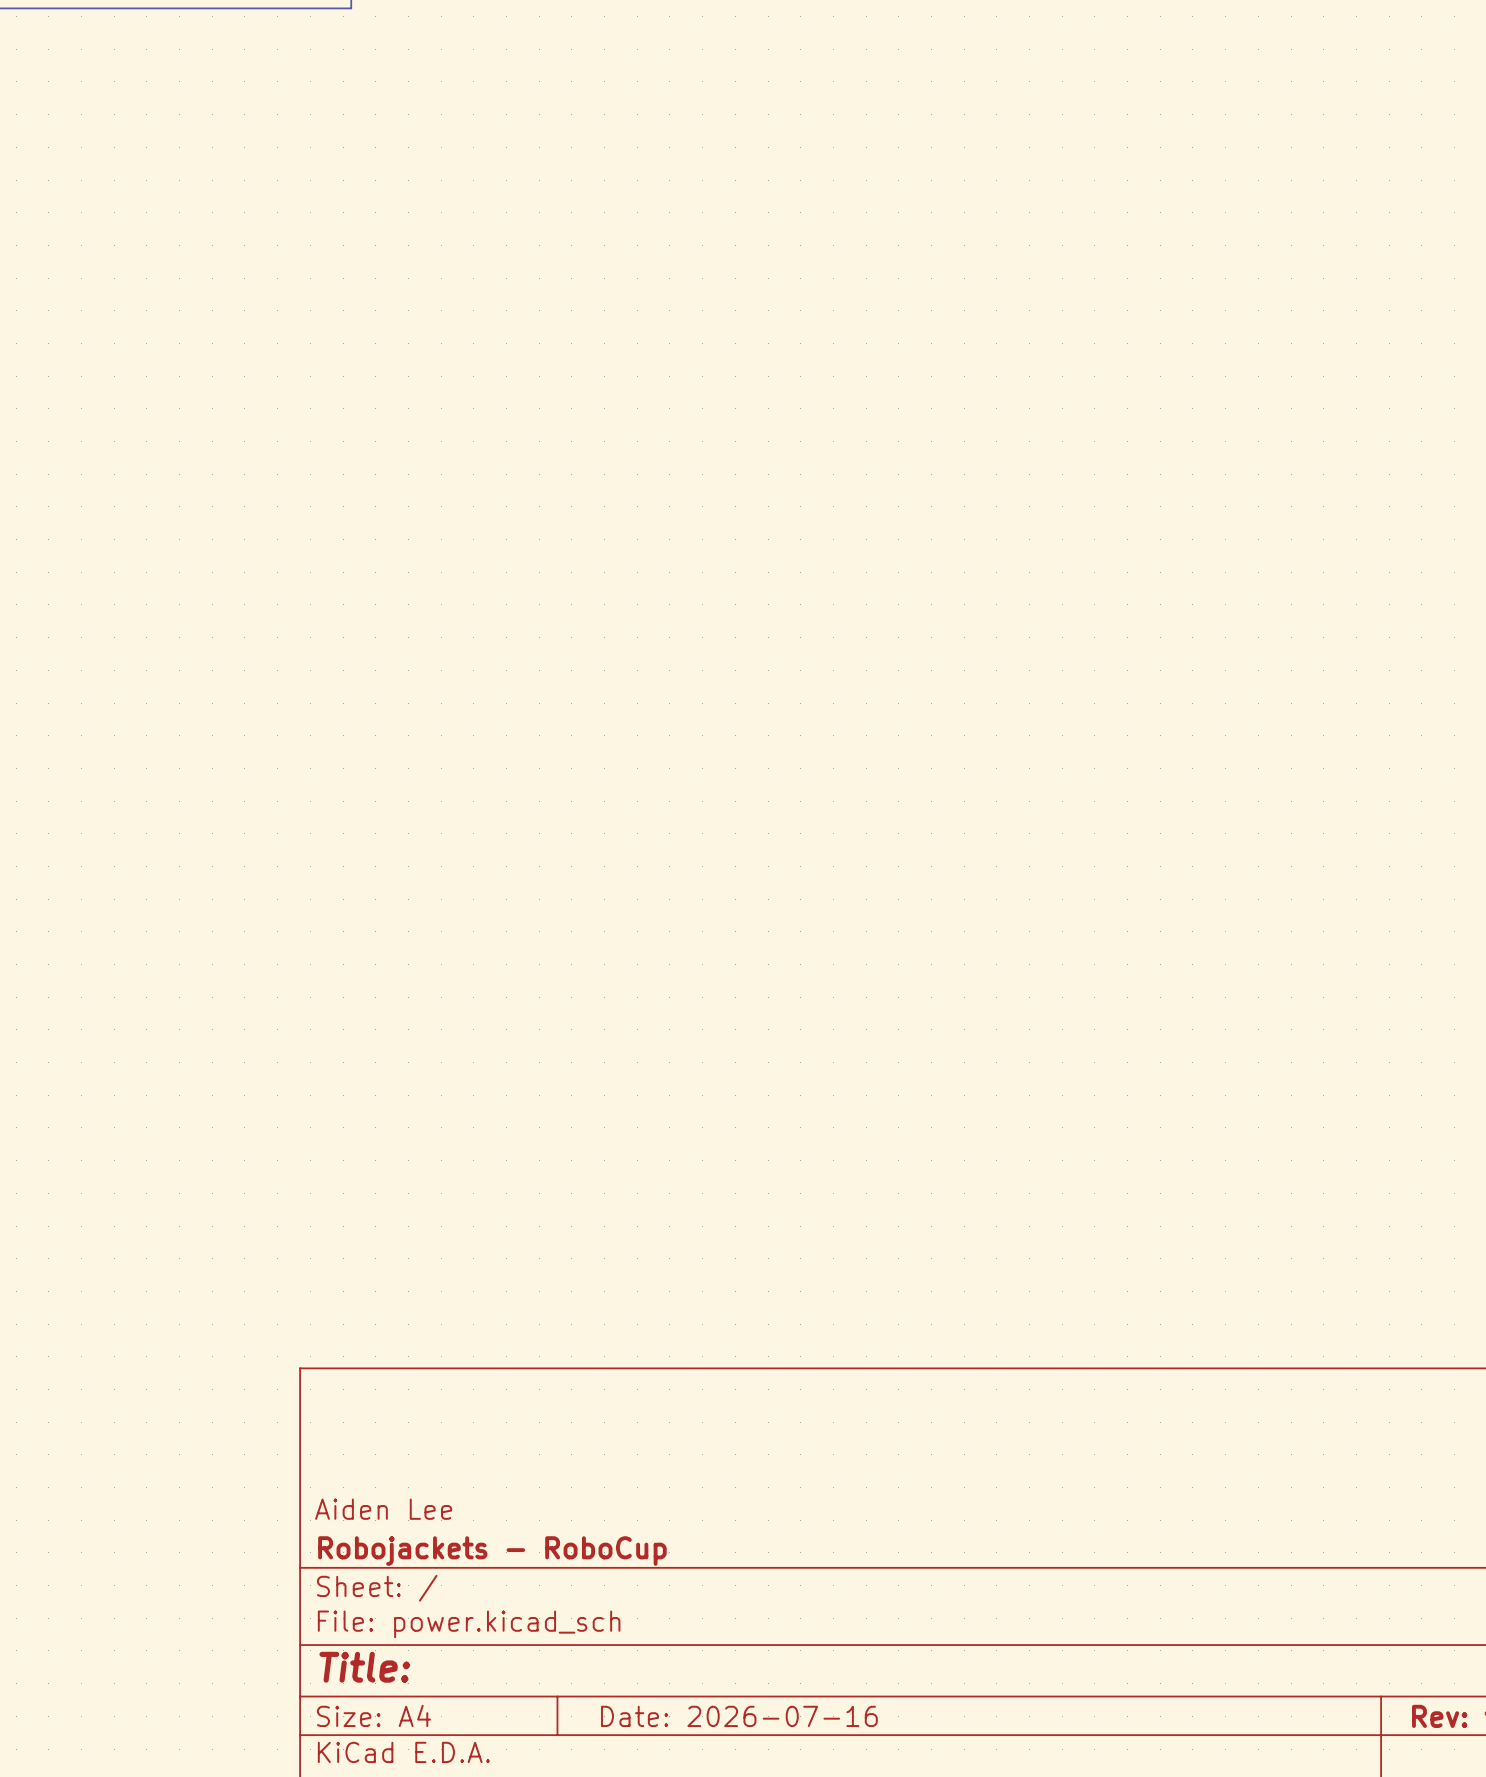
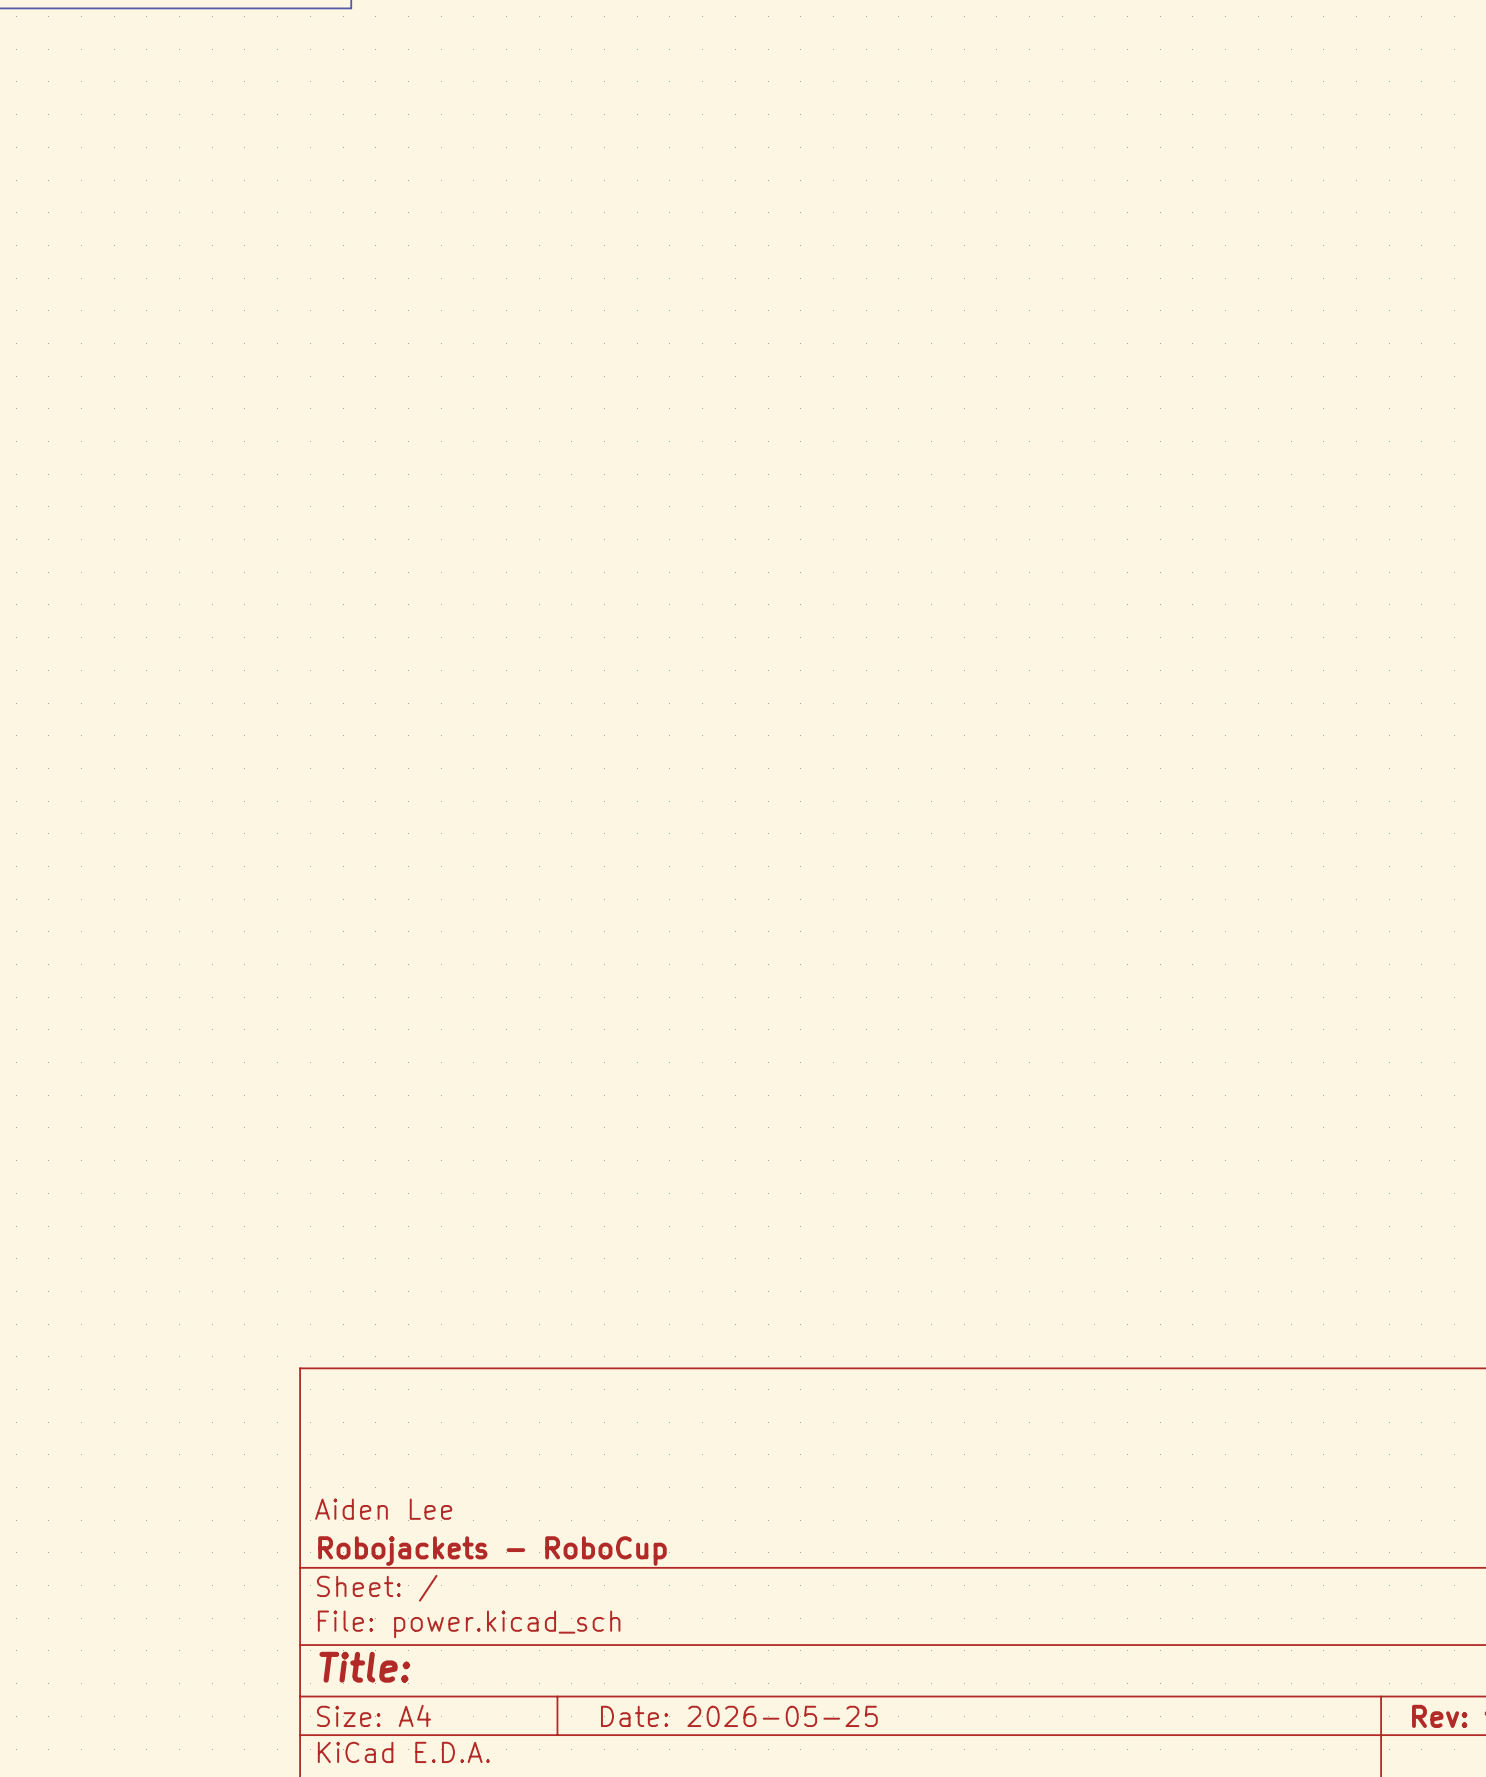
title block: Date: 2026-07-16 (739, 1716) -> Date: 2026-05-25 (739, 1716)

